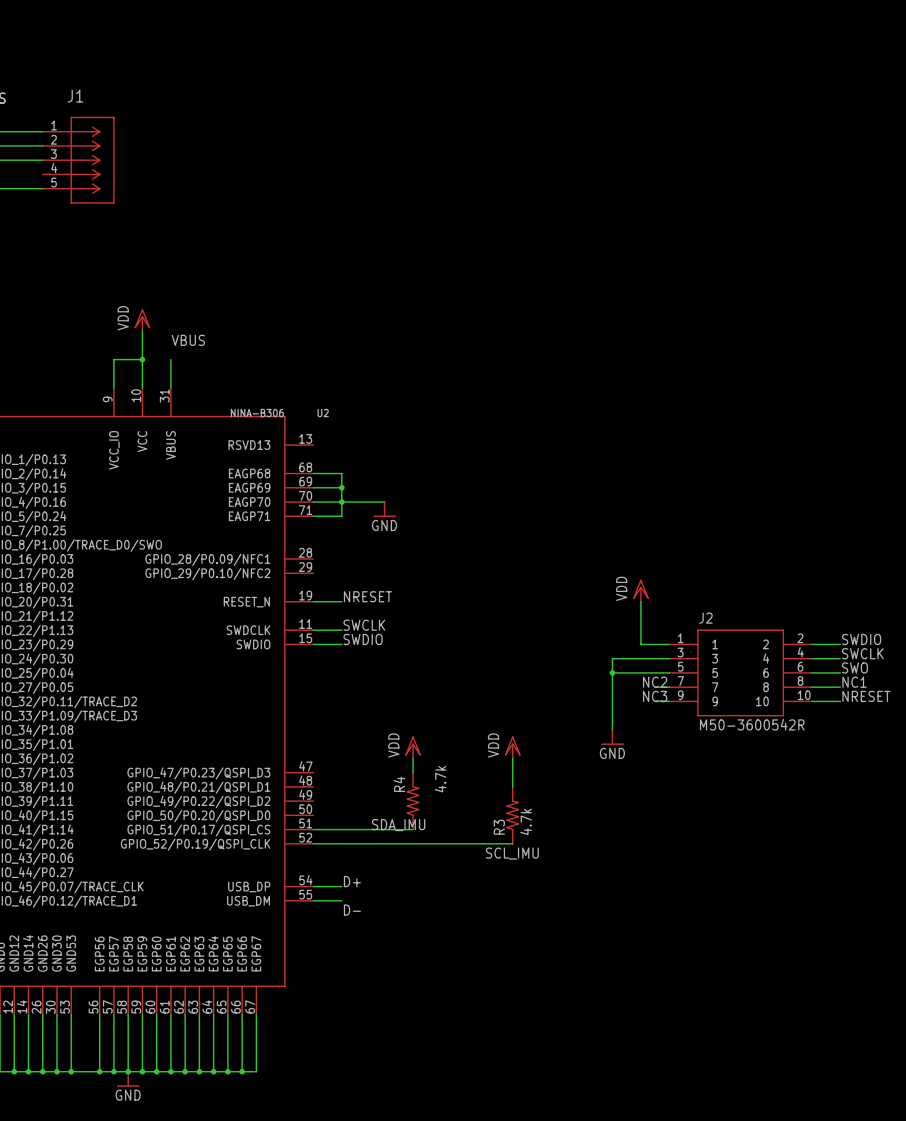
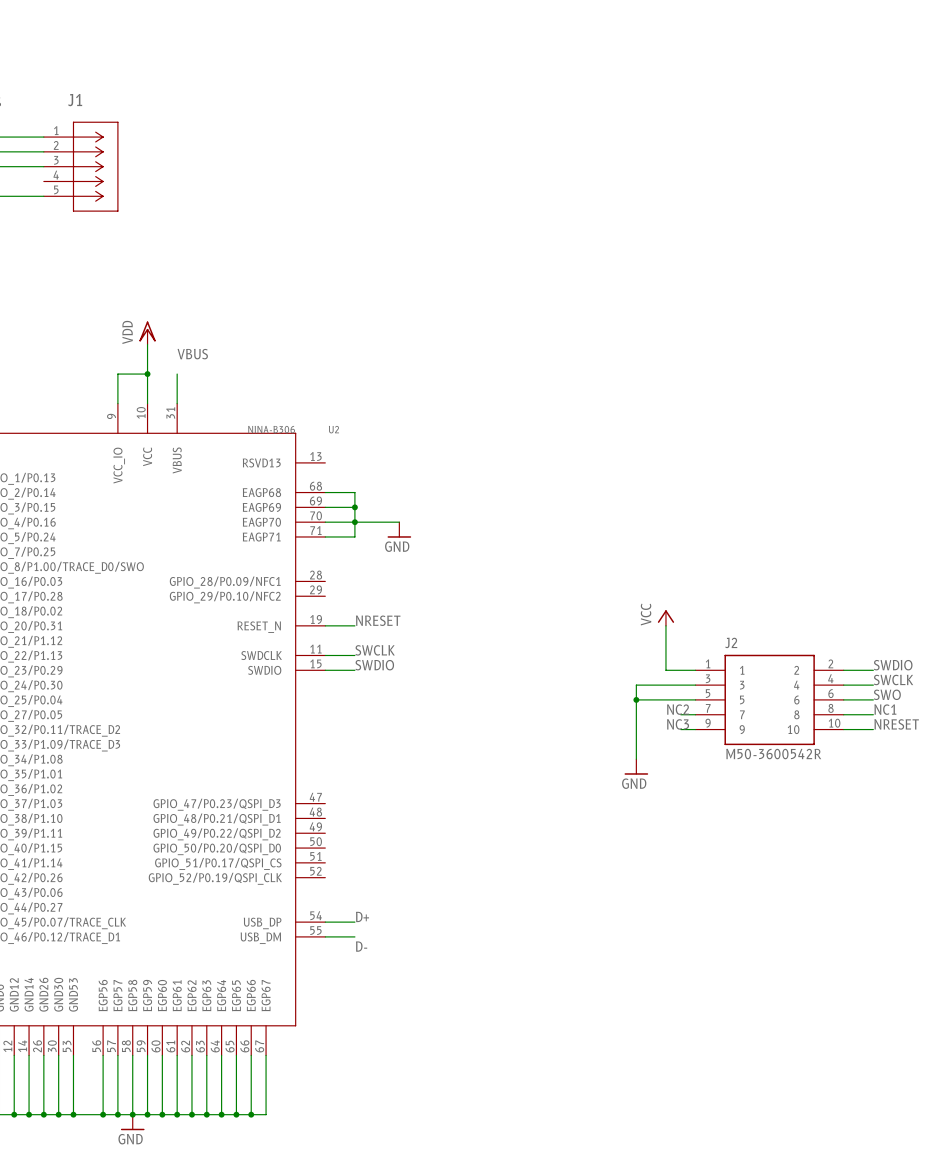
power symbol: VDD (640, 590) -> VCC (665, 618)
power symbol: VDD (413, 747) -> none
power symbol: VDD (512, 747) -> none
wire: (413, 758) (413, 772) -> none
wire: (512, 758) (512, 786) -> none
R4: 4.7k (413, 801) -> none
R3: 4.7k (512, 815) -> none
label: SDA_IMU (398, 825) -> none
wire: (313, 829) (413, 829) -> none
wire: (313, 843) (512, 843) -> none
label: SCL_IMU (512, 853) -> none

